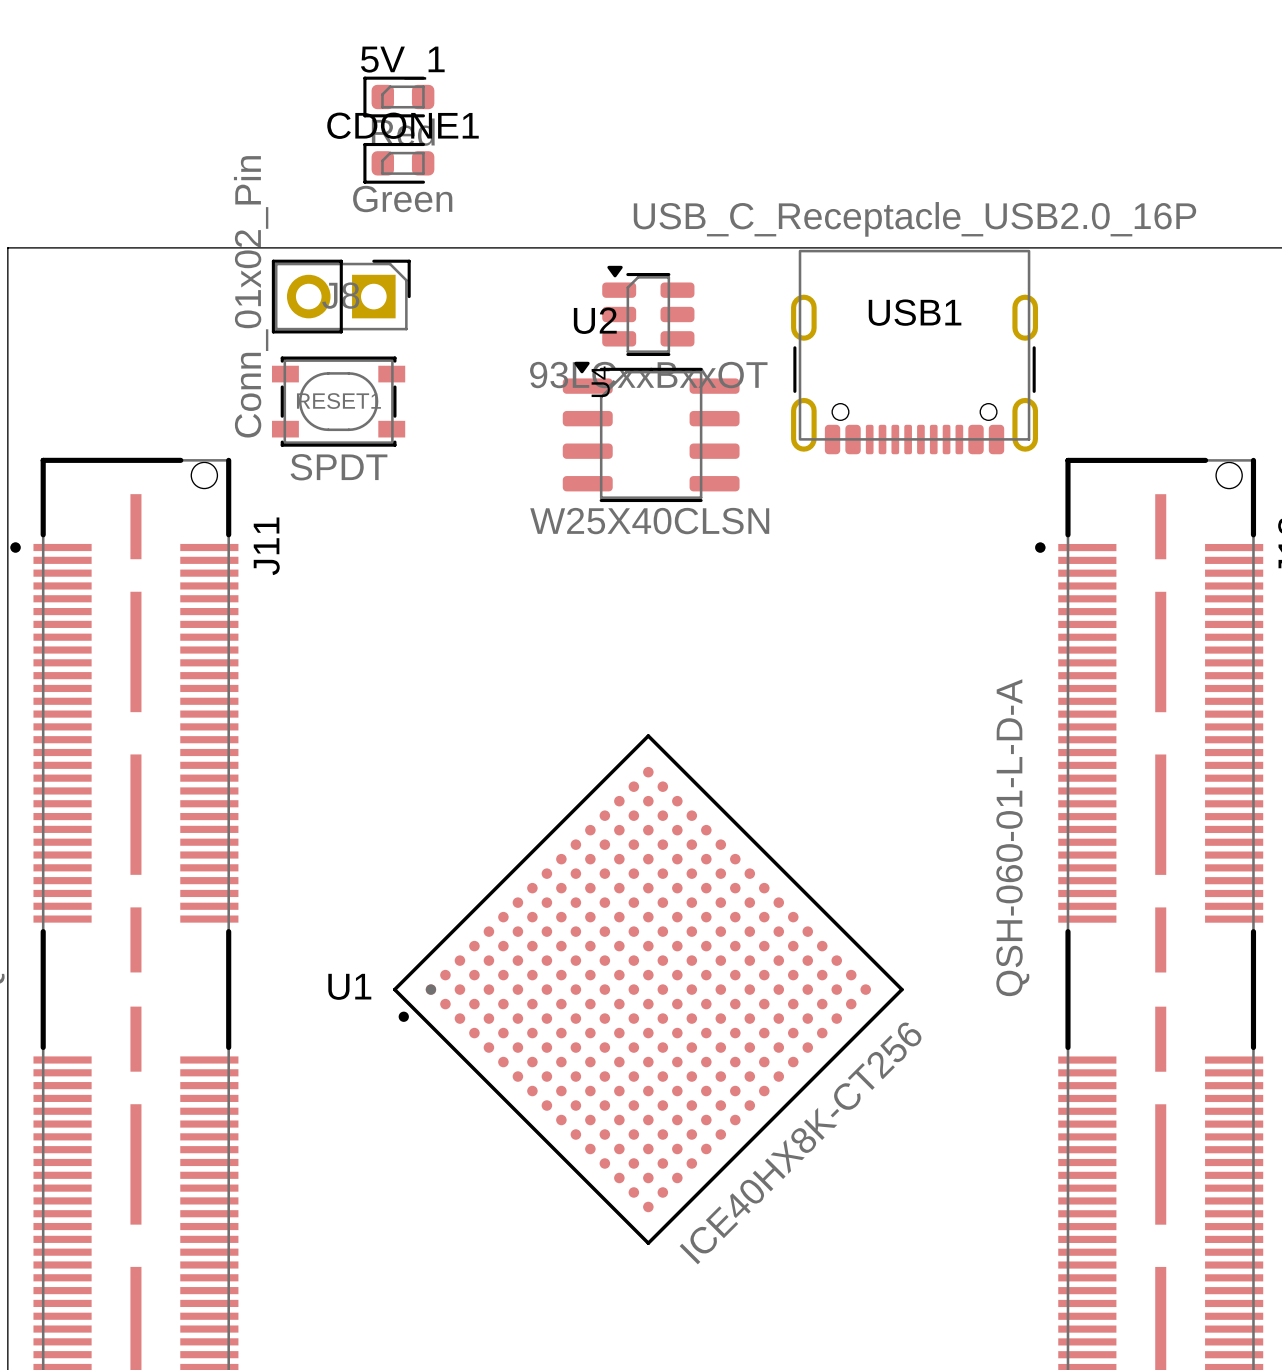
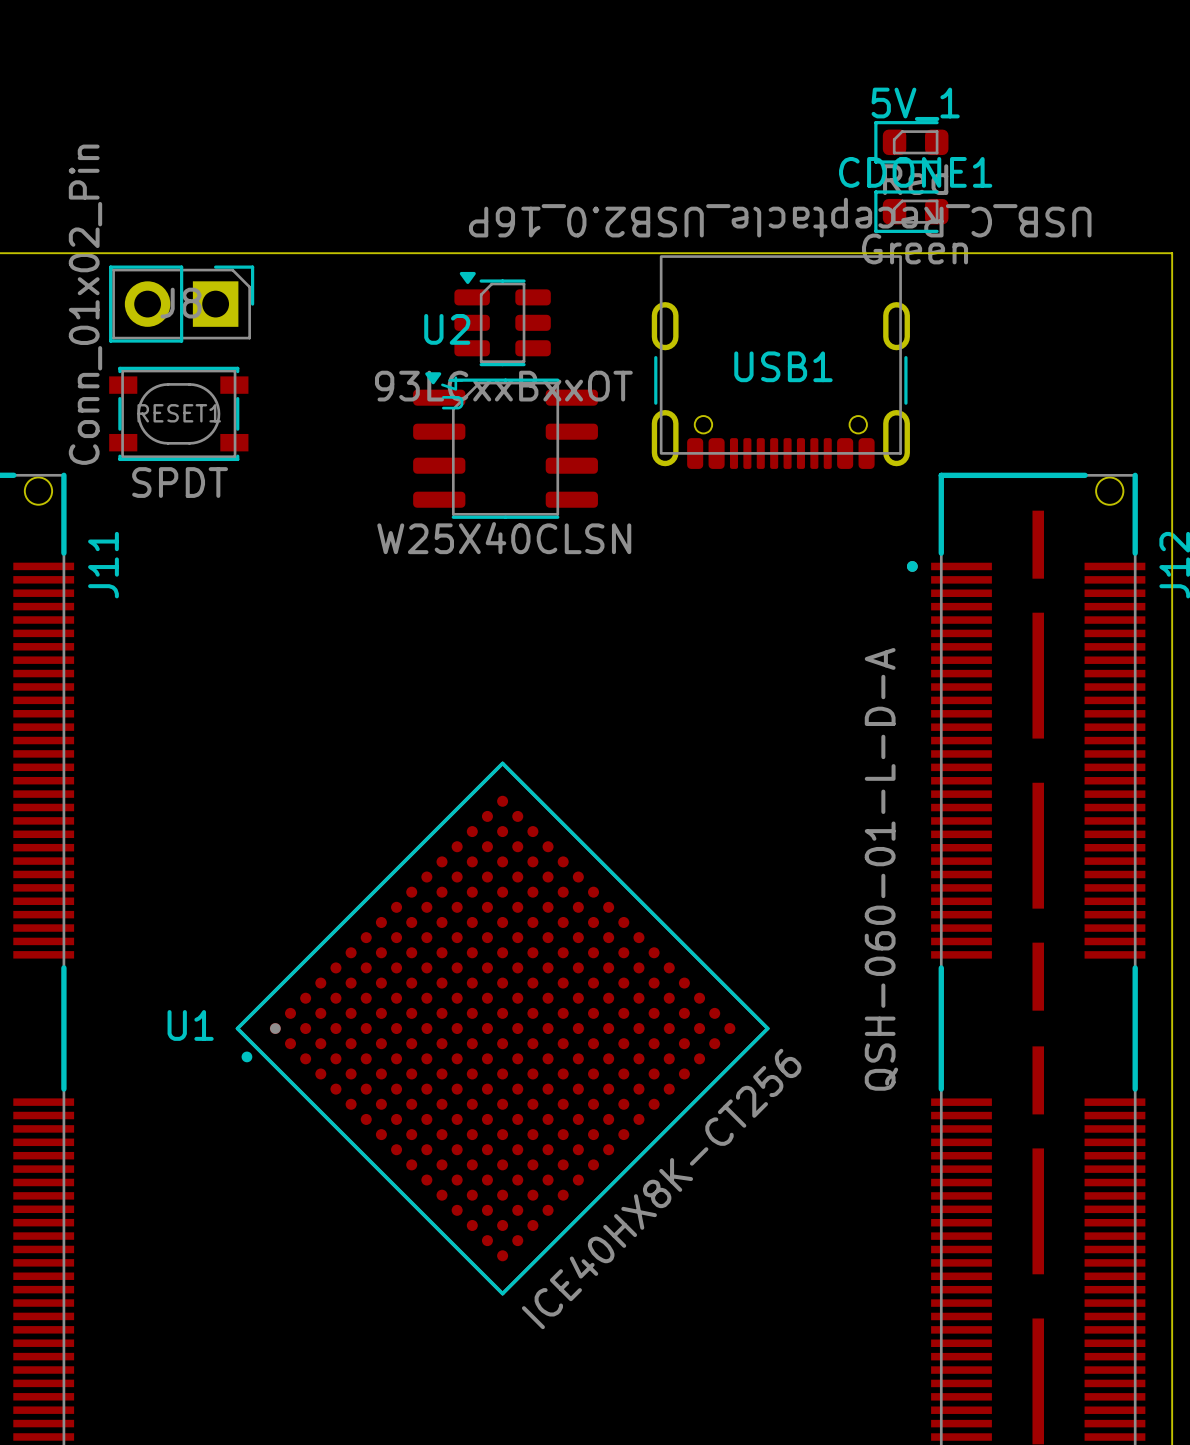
5V_1 position: (398, 97) -> (911, 142)
CDONE1 position: (398, 163) -> (911, 211)
USB1 value rotation: 0° (914, 219) -> 180° (780, 217)
USB1 name position: USB1 (915, 312) -> USB1 (783, 366)

